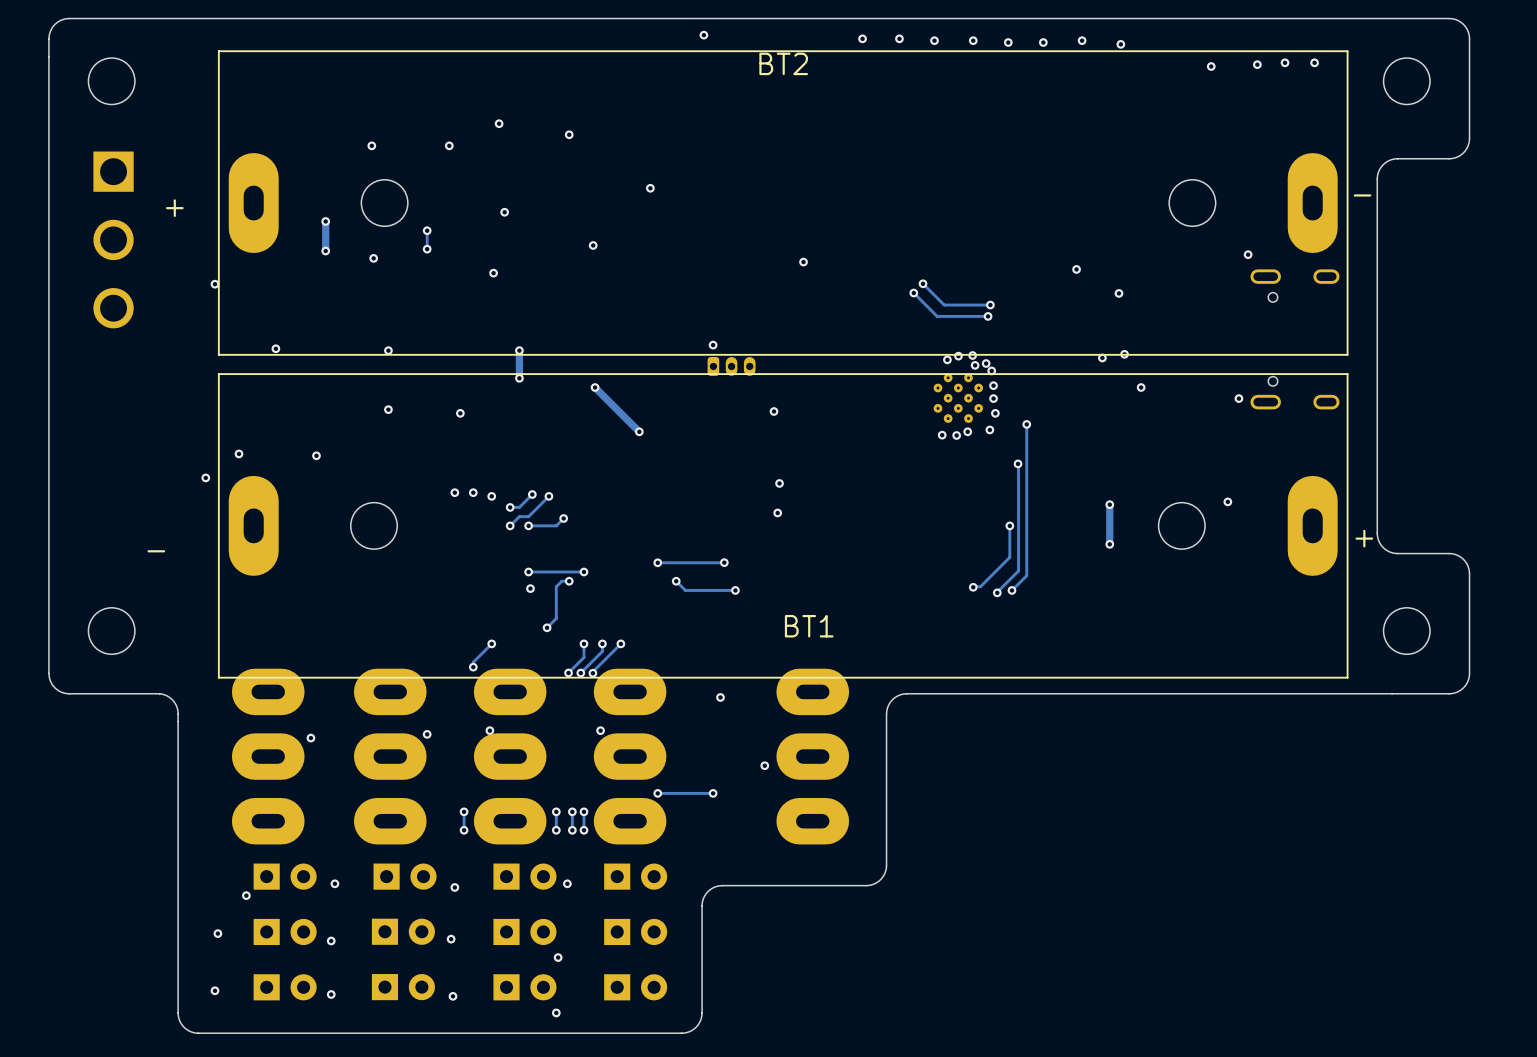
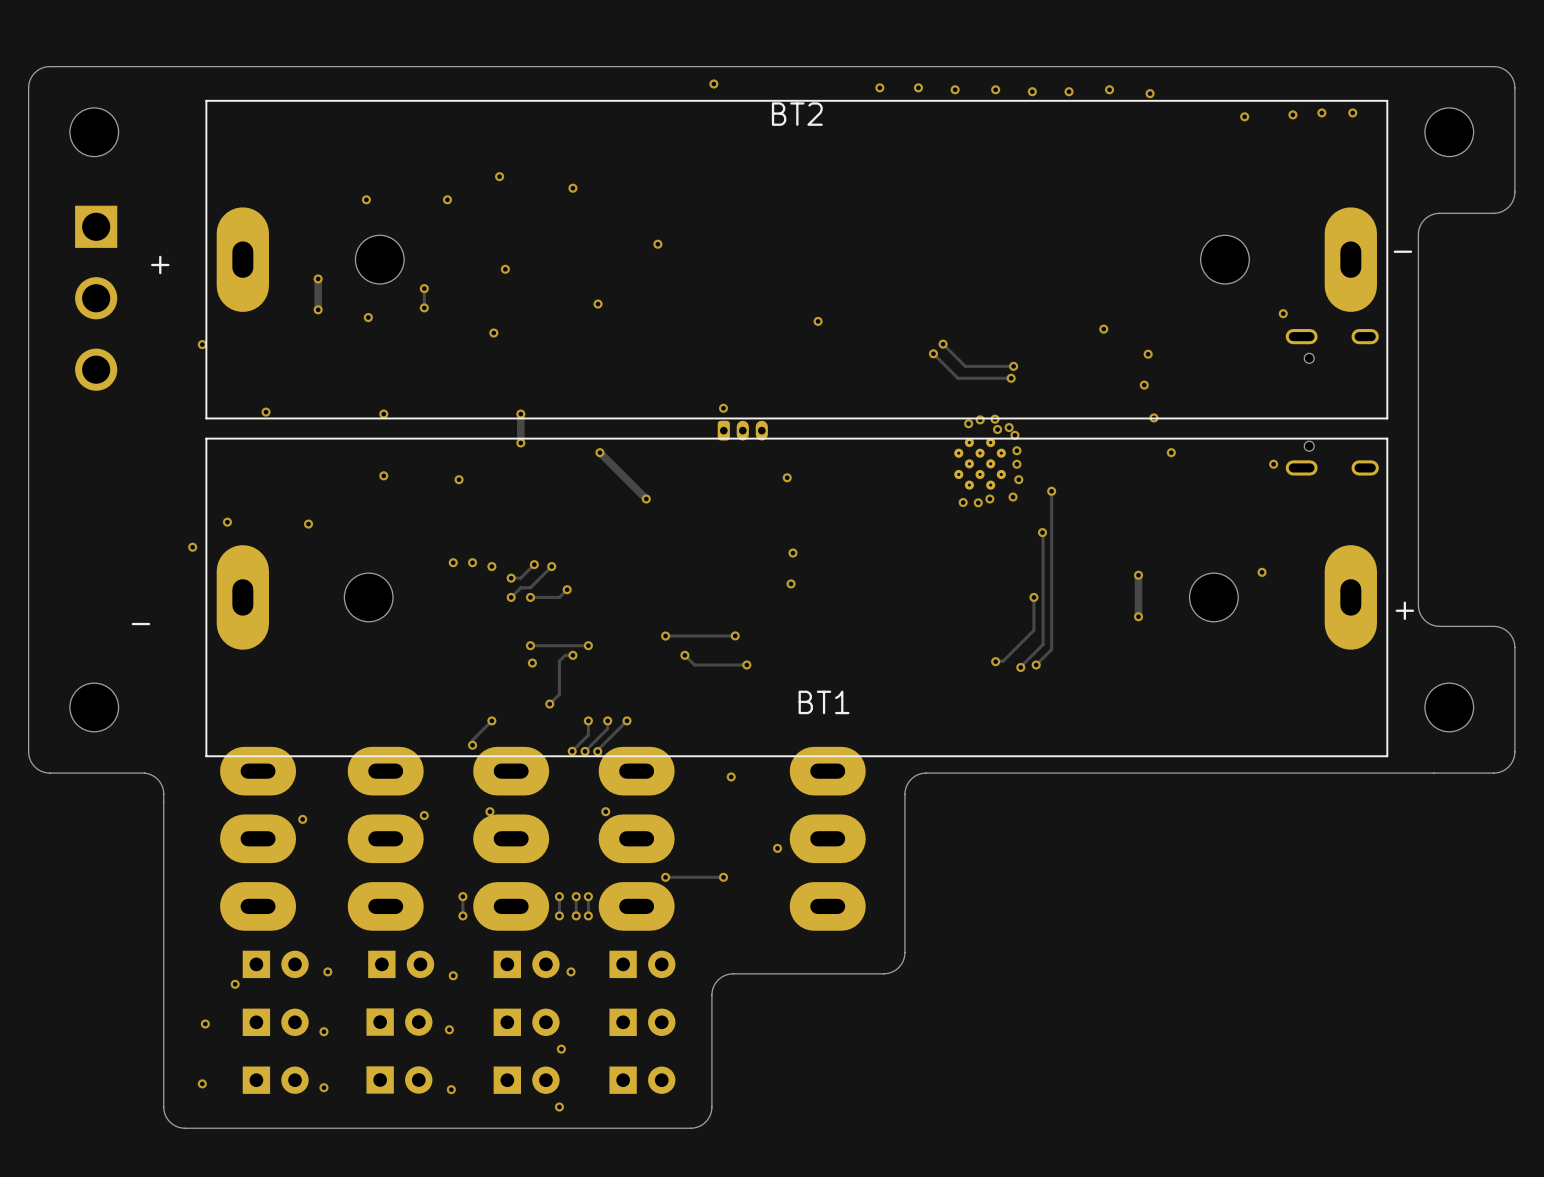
via position: (1102, 358) -> (1144, 385)

